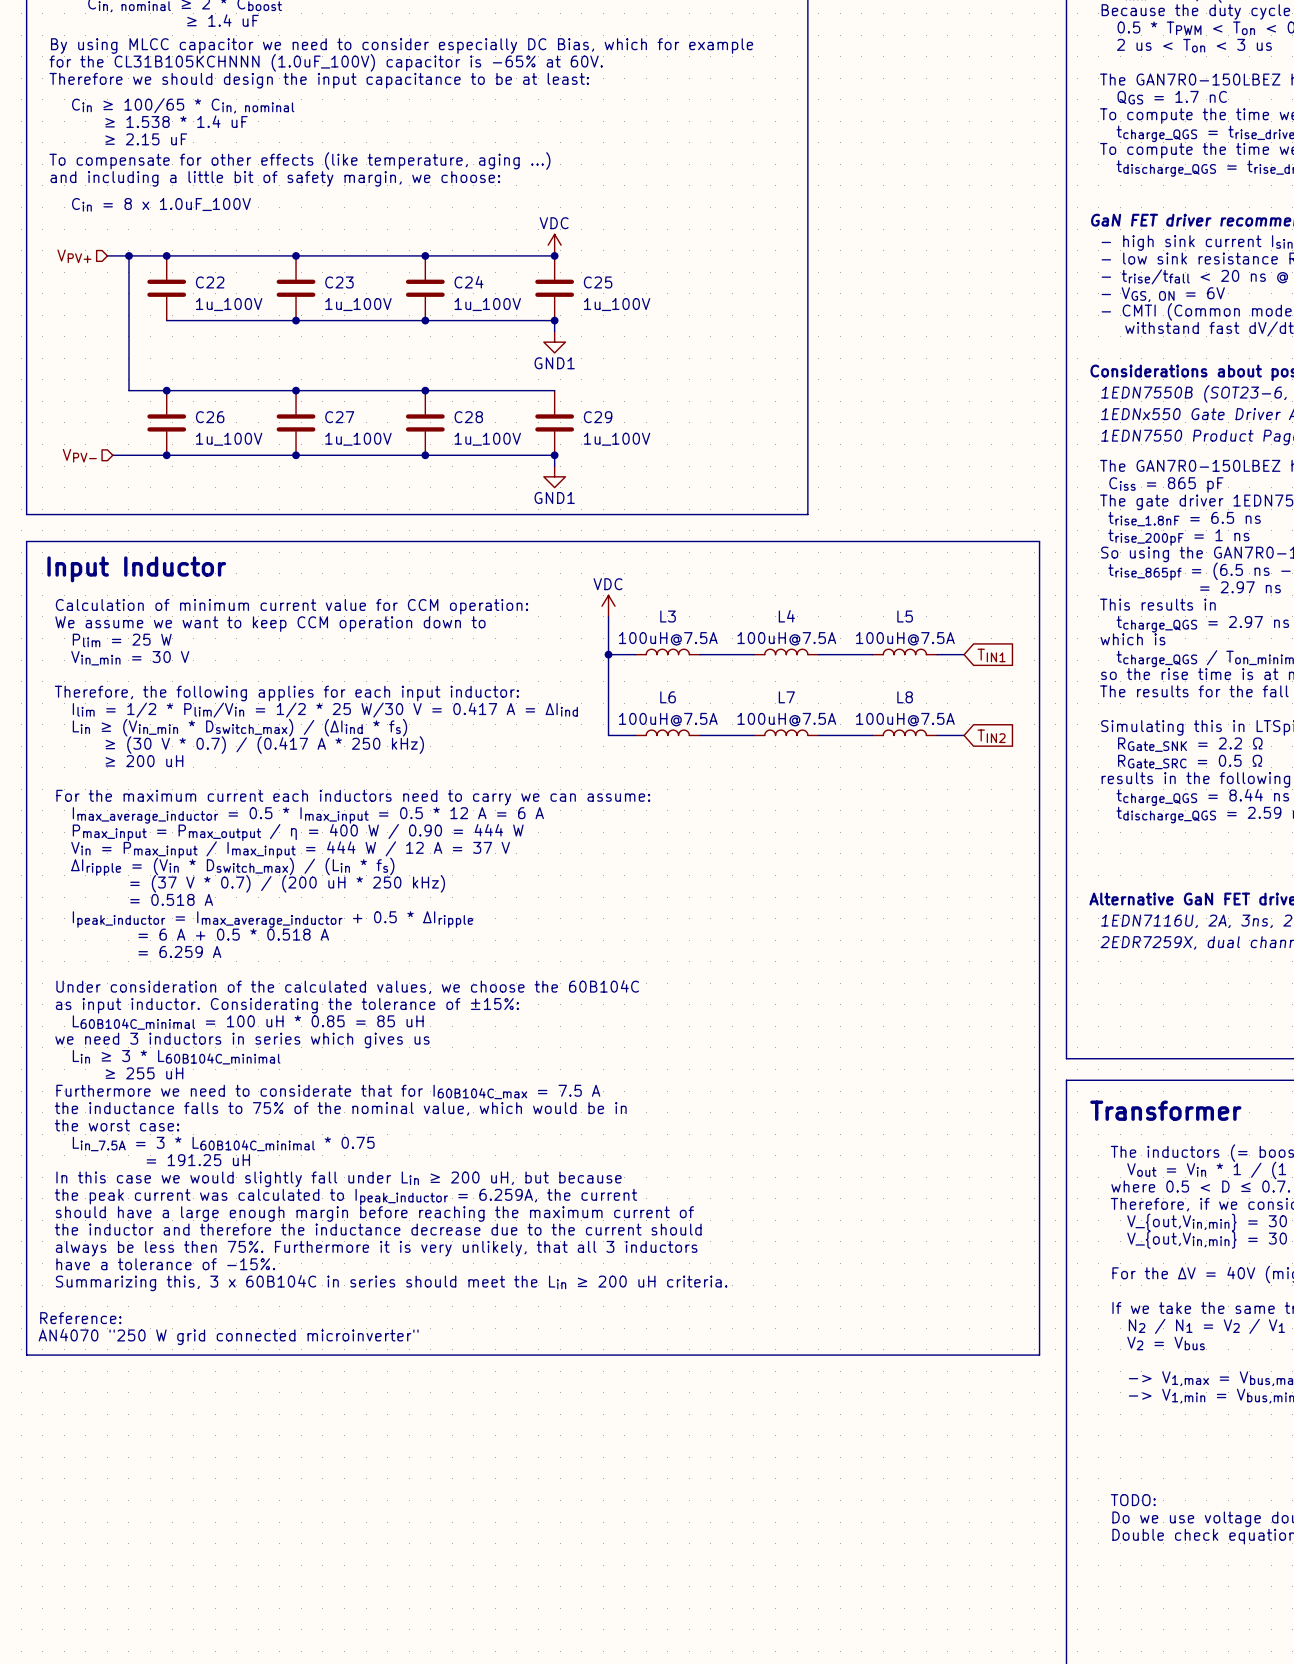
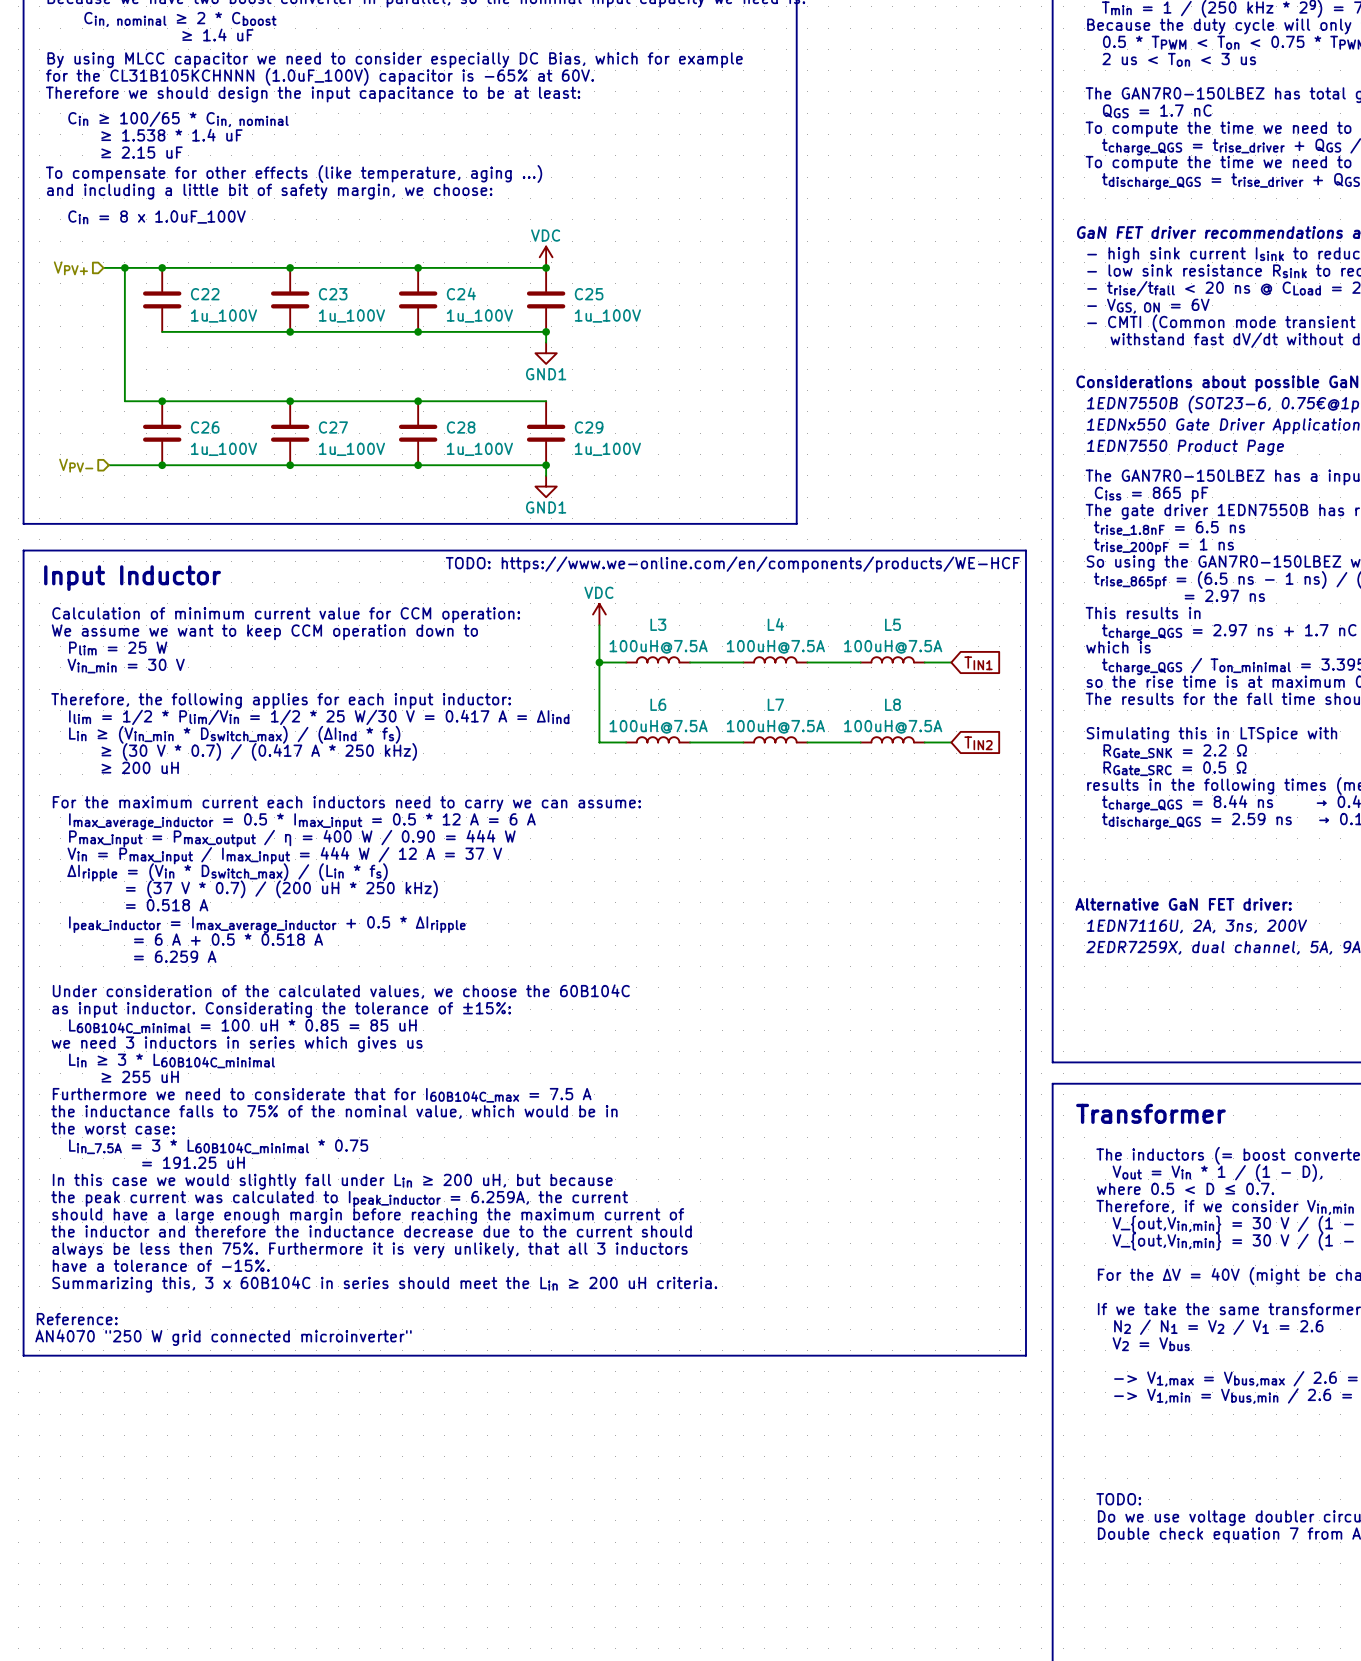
text: none -> TODO: https://www.we-online.com/en/components/products/WE-HCF (732, 564)

